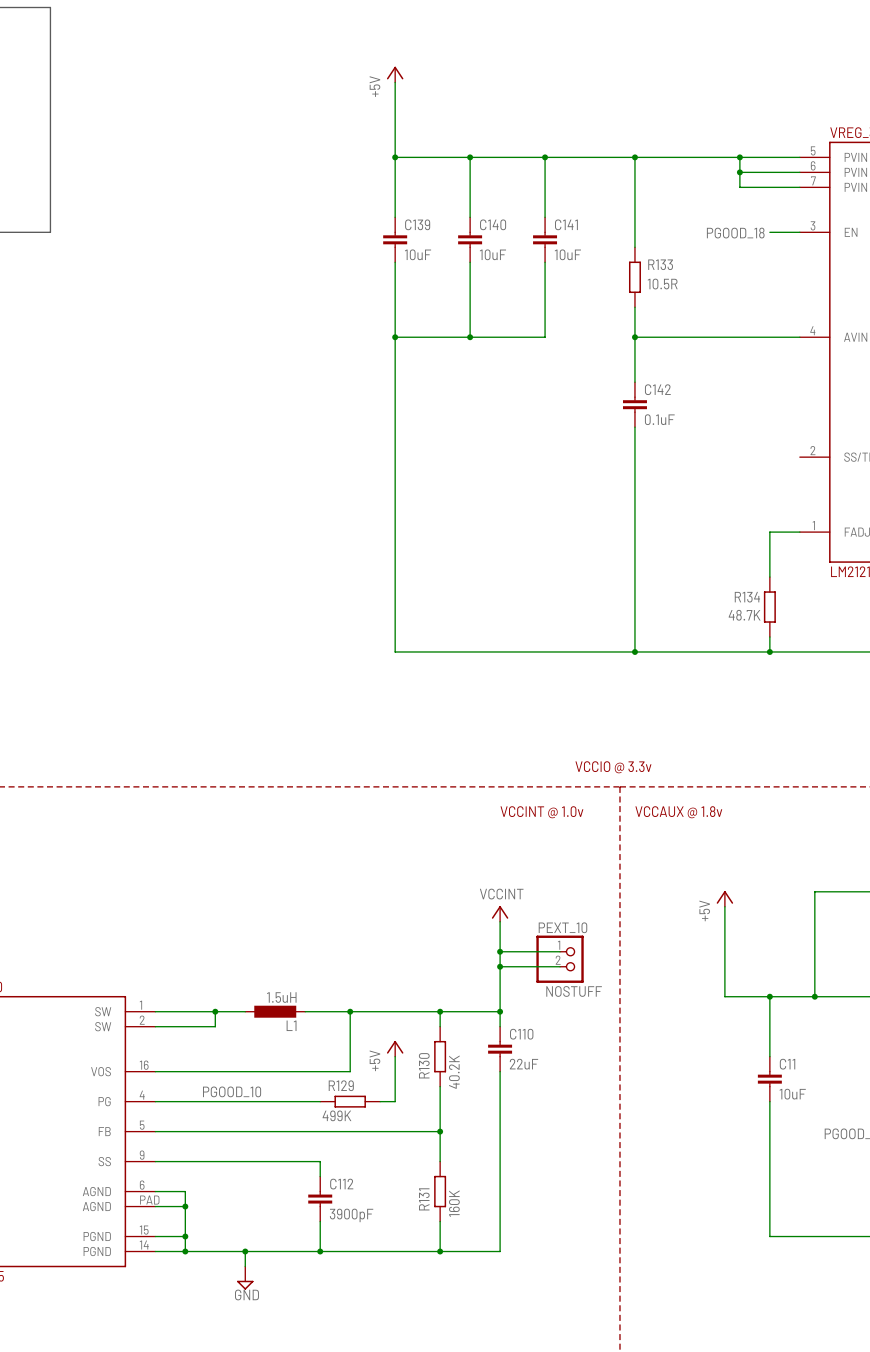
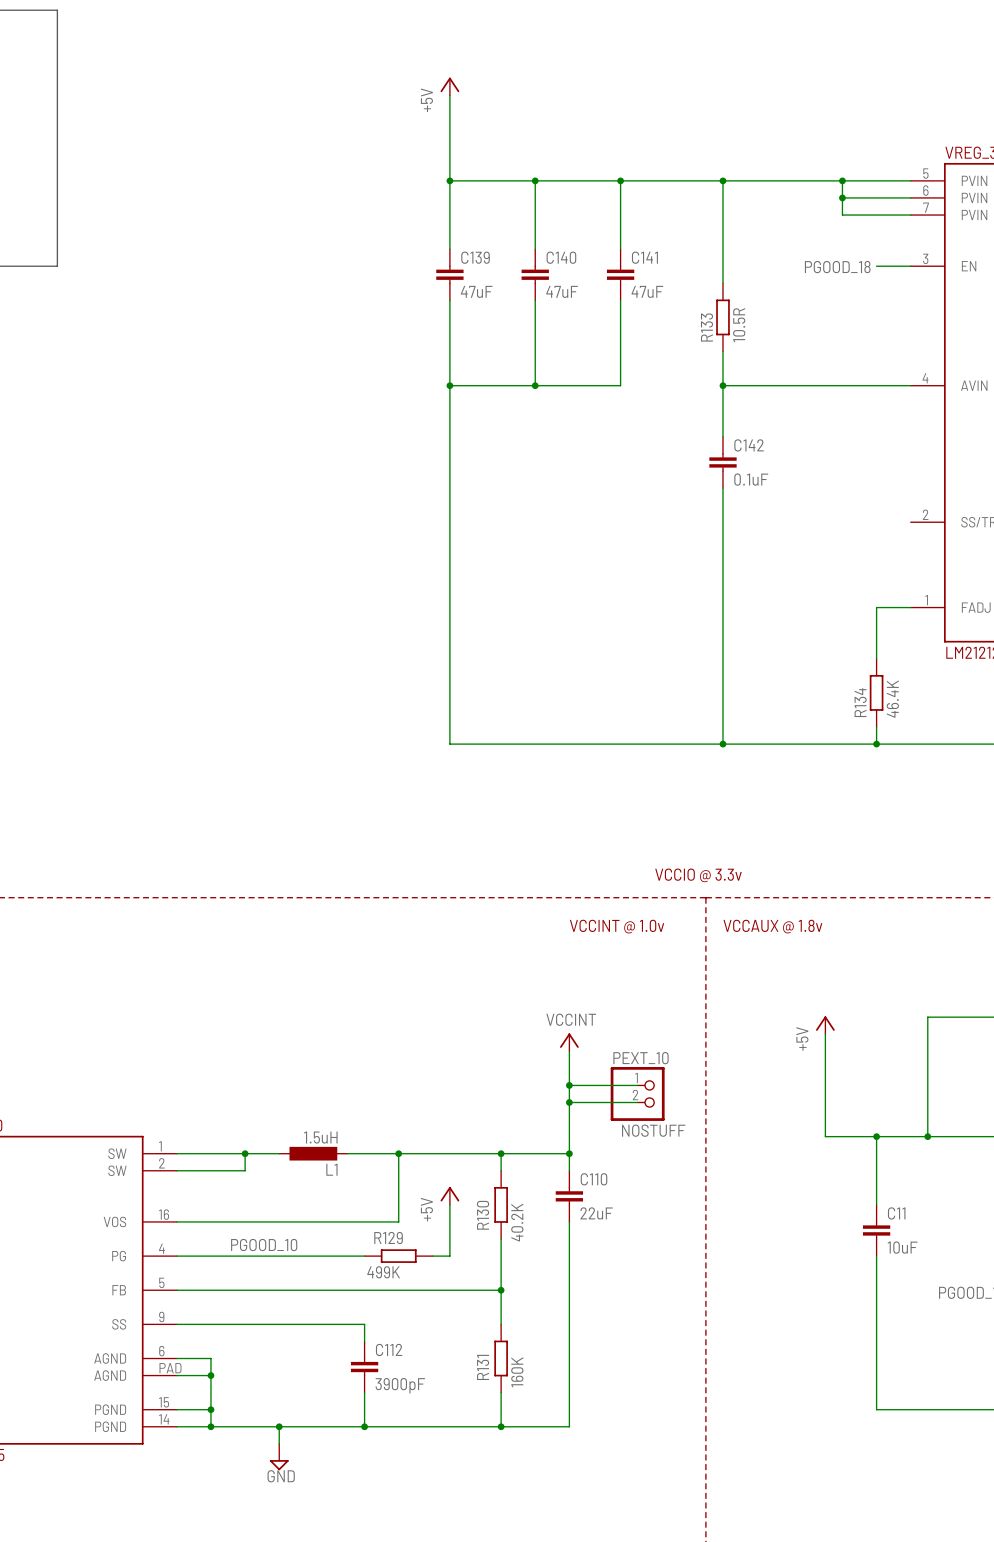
C139 value: 10uF (418, 254) -> 47uF (476, 291)
C140 value: 10uF (492, 254) -> 47uF (562, 291)
C141 value: 10uF (567, 254) -> 47uF (647, 291)
R133 name rotation: 0° (660, 264) -> 90° counterclockwise (707, 327)
R133 name position: R133 (660, 264) -> R133 (707, 327)
R133 value rotation: 0° (662, 284) -> 90° counterclockwise (739, 325)
R134 name rotation: 0° (747, 597) -> 90° counterclockwise (860, 702)
R134 value: 48.7K (744, 615) -> 46.4K (892, 699)

